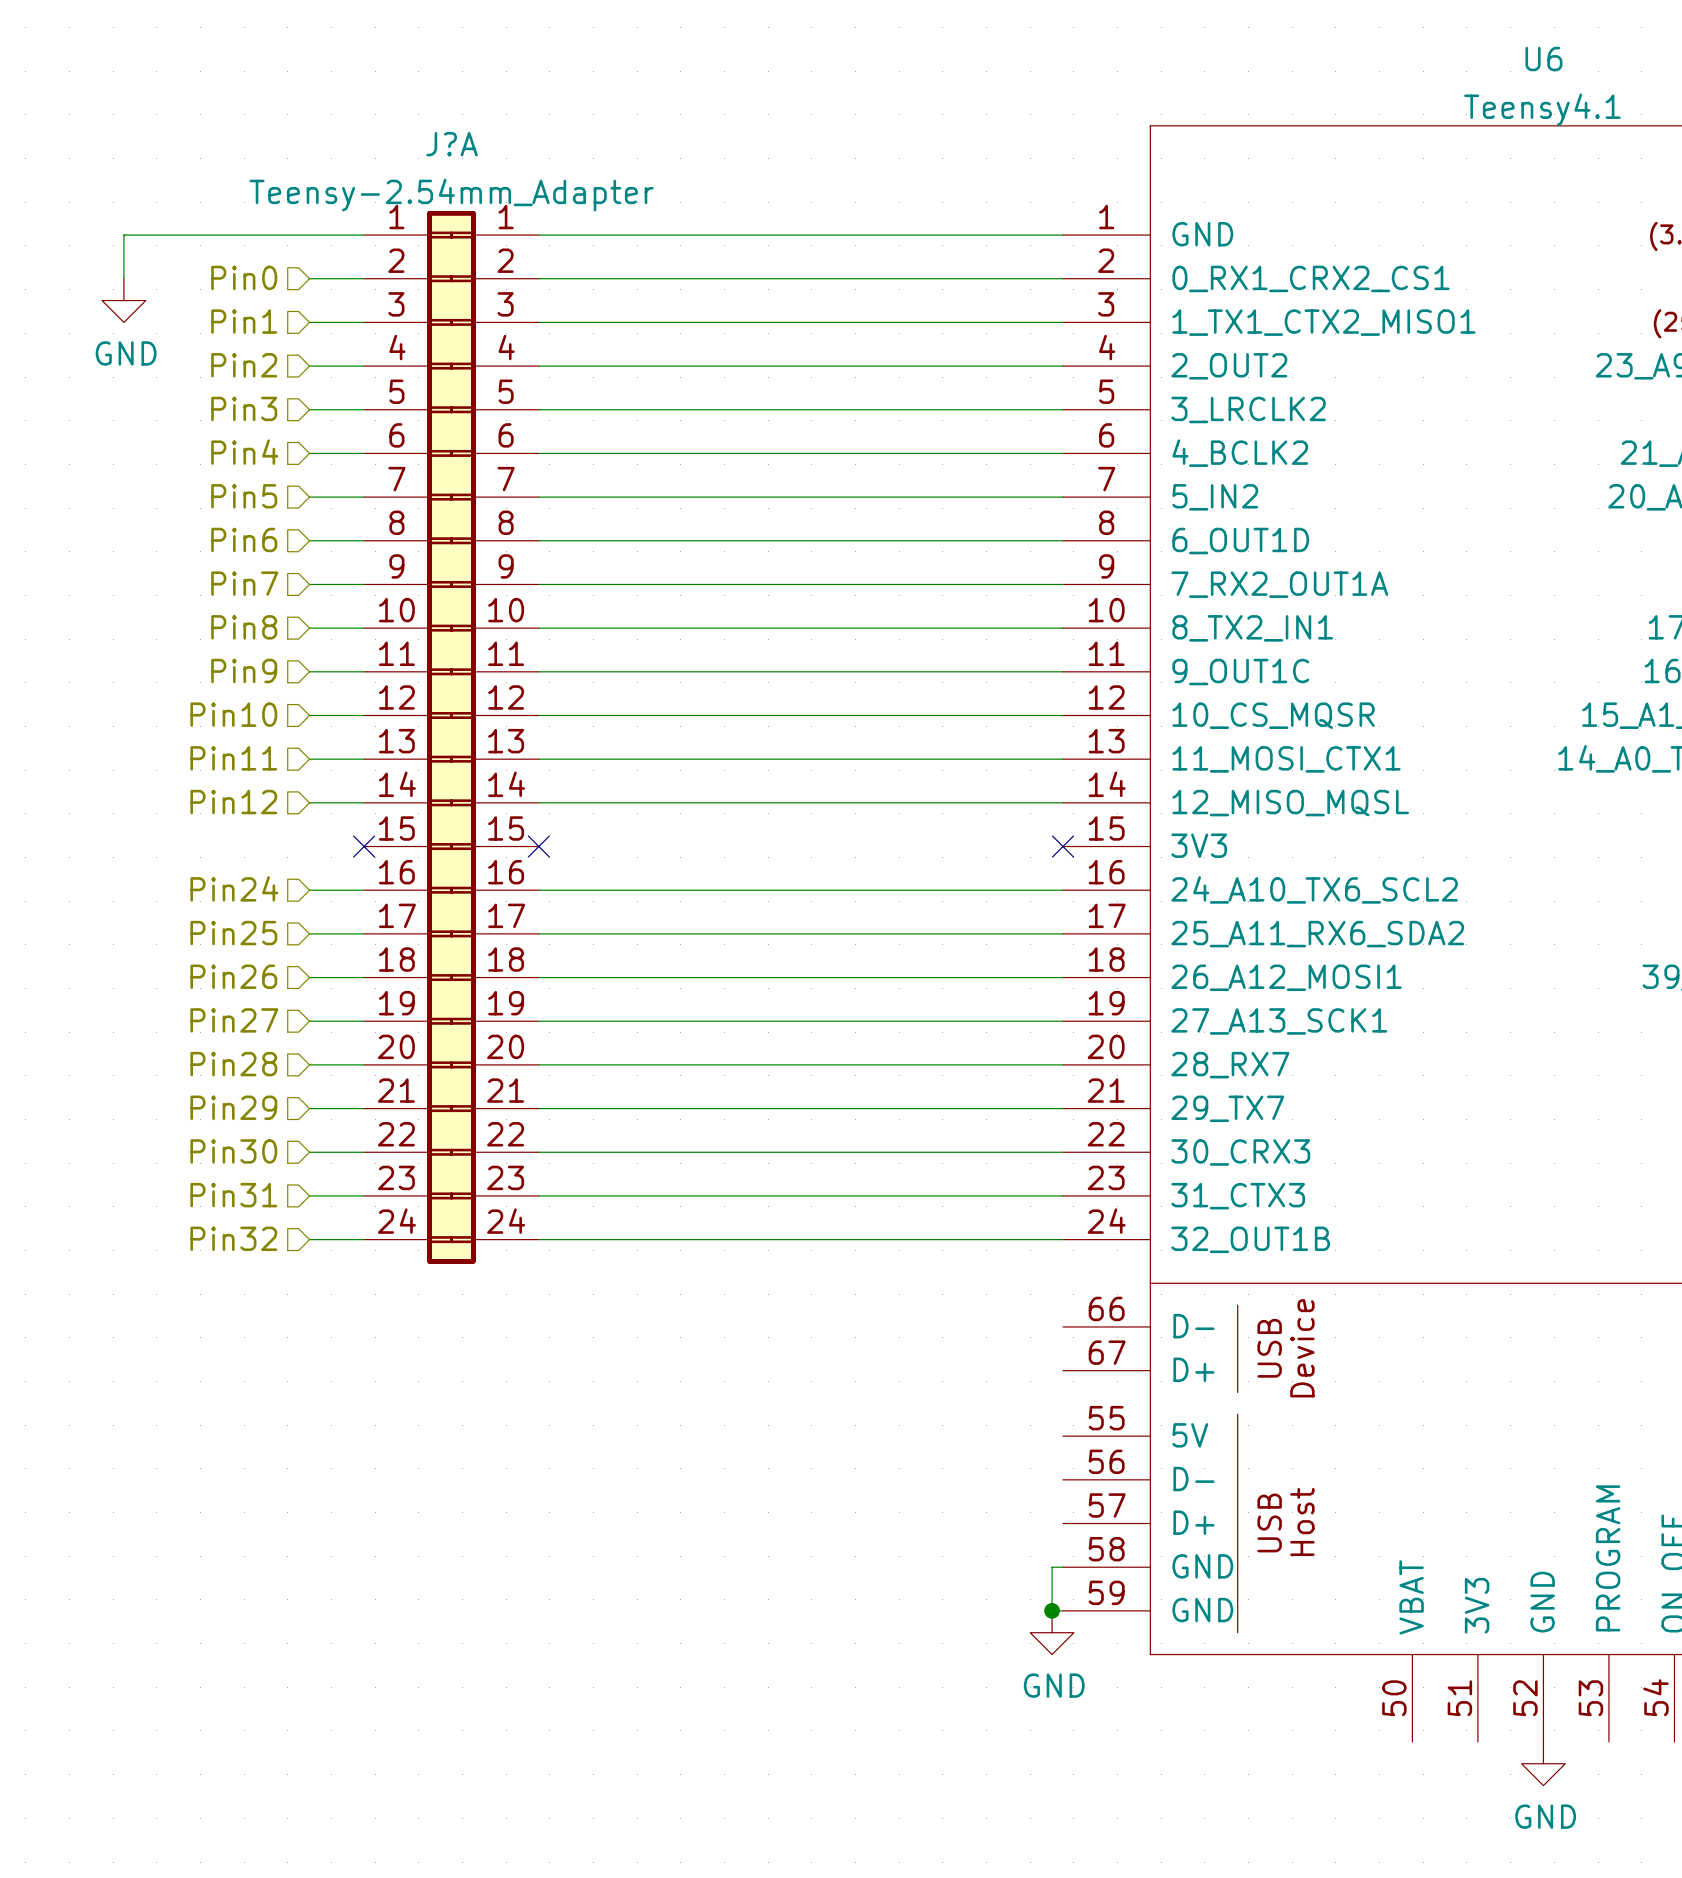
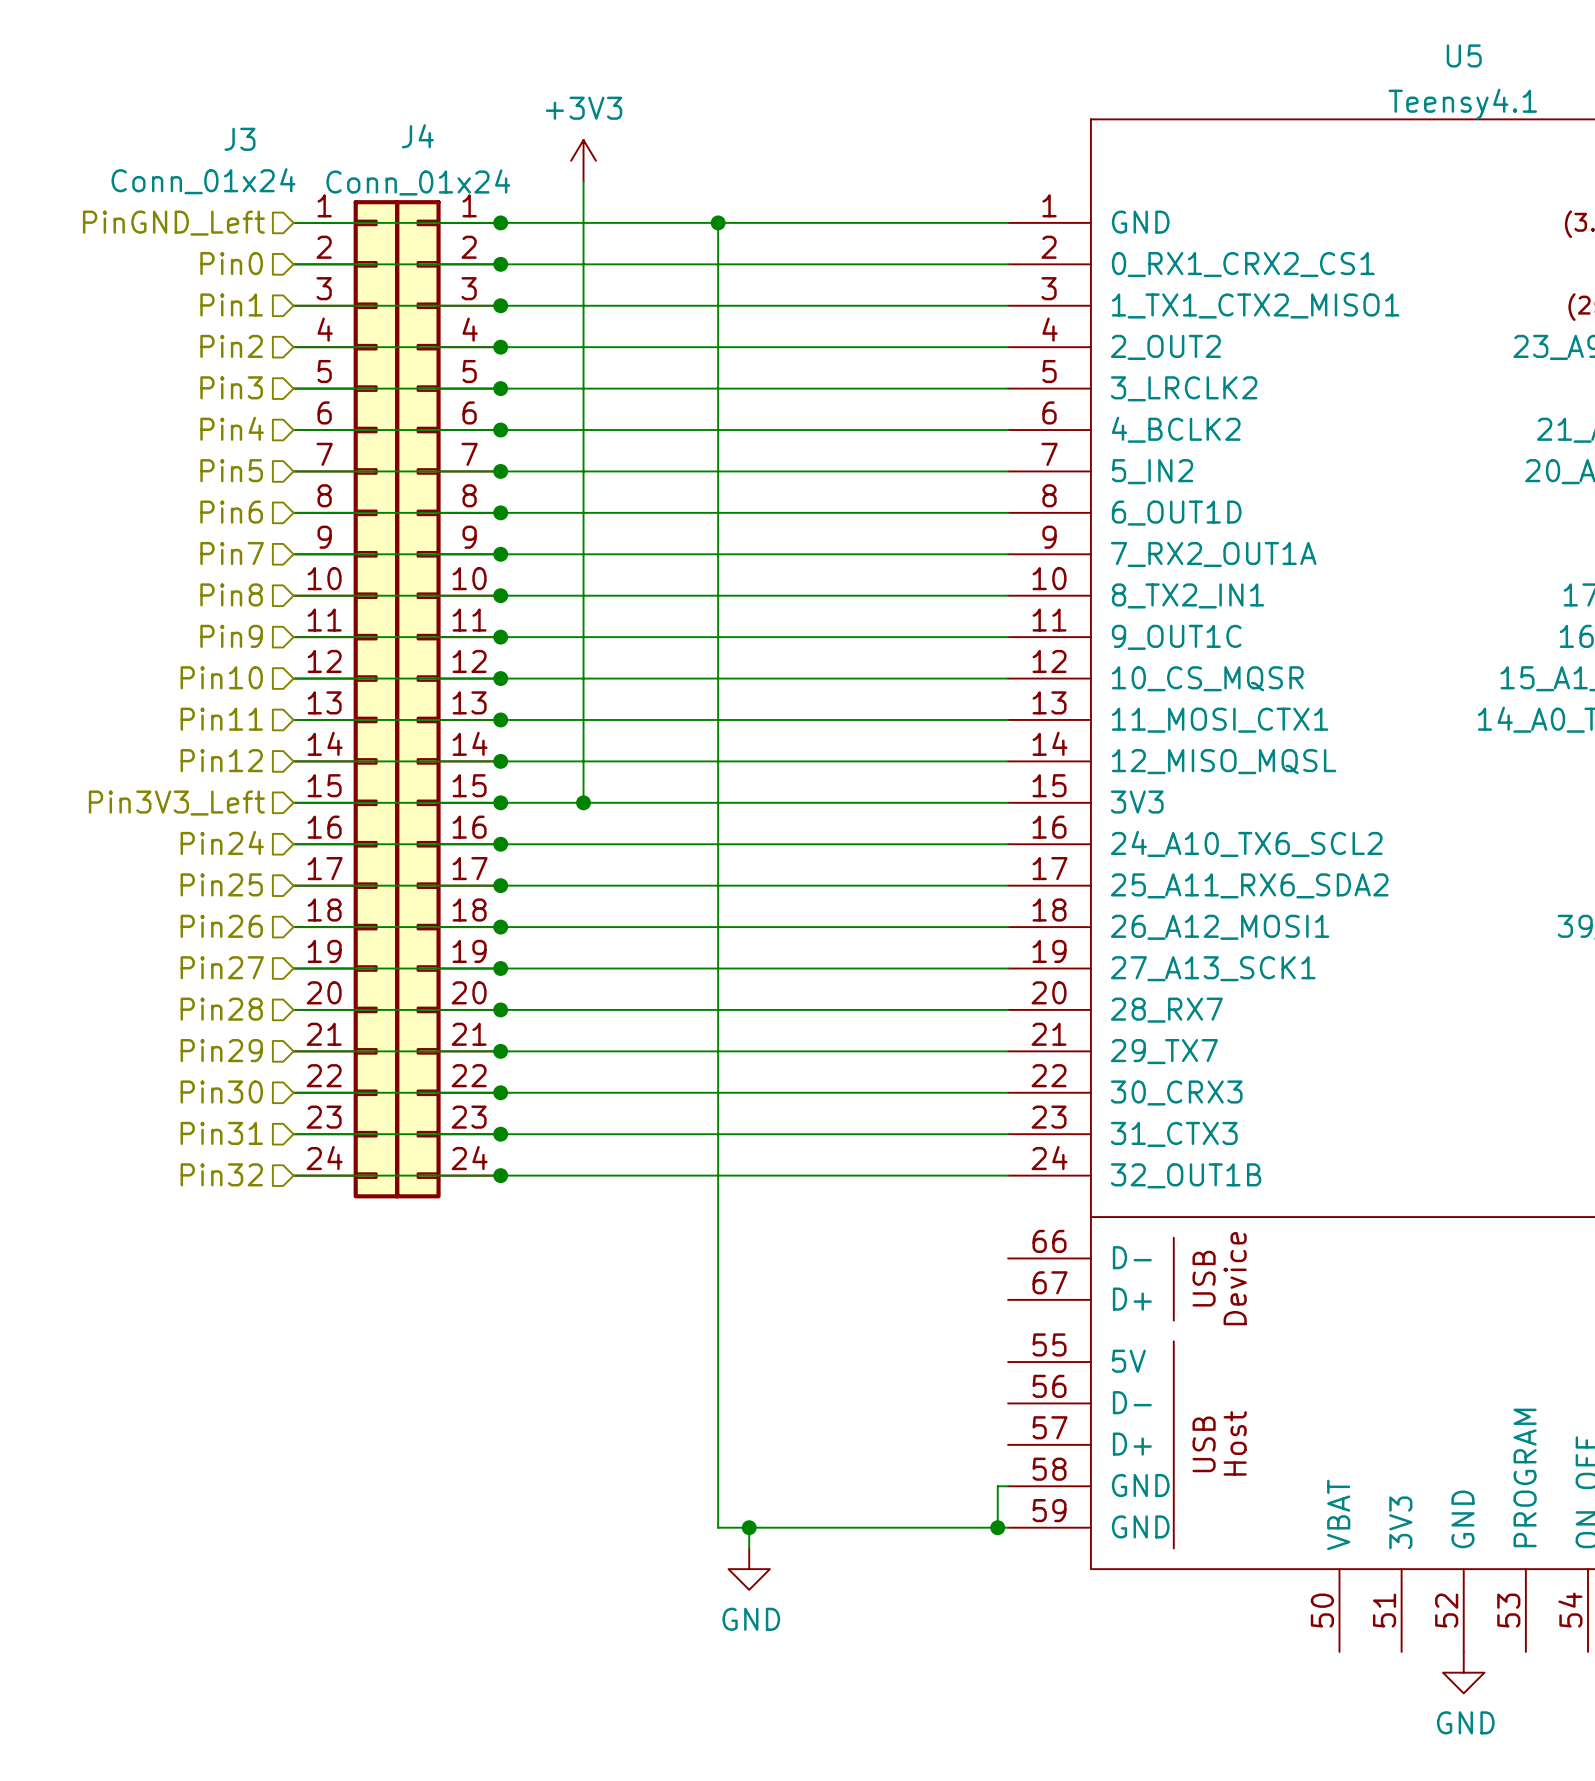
U6 name: U6 (1543, 59) -> U5 (1464, 55)
power symbol: none -> +3V3 (583, 160)
wire: none -> (583, 181) (583, 802)
hierarchical label: none -> PinGND_Left (173, 223)
wire: (309, 235) (123, 235) (123, 278) -> none
junction: none -> (500, 222)
wire: none -> (718, 222) (718, 1527) (997, 1527)
junction: none -> (718, 222)
junction: none -> (500, 264)
power symbol: GND (123, 300) -> none
junction: none -> (500, 305)
junction: none -> (500, 347)
junction: none -> (500, 388)
junction: none -> (500, 430)
junction: none -> (500, 471)
junction: none -> (500, 512)
junction: none -> (500, 554)
junction: none -> (500, 595)
junction: none -> (500, 637)
junction: none -> (500, 678)
J3: none -> Conn_01x24 (346, 699)
J?A: Teensy-2.54mm_Adapter (451, 737) -> none
J4: none -> Conn_01x24 (447, 699)
junction: none -> (500, 719)
junction: none -> (500, 761)
hierarchical label: none -> Pin3V3_Left (176, 803)
wire: none -> (293, 802) (1008, 802)
no-connect mark: (364, 846) -> none
junction: none -> (500, 802)
no-connect mark: (538, 846) -> none
junction: none -> (583, 802)
no-connect mark: (1062, 846) -> none
junction: none -> (500, 844)
junction: none -> (500, 885)
junction: none -> (500, 927)
junction: none -> (500, 968)
junction: none -> (500, 1009)
junction: none -> (500, 1051)
junction: none -> (500, 1092)
junction: none -> (500, 1134)
junction: none -> (500, 1175)
wire: none -> (749, 1527) (749, 1548)
junction: none -> (749, 1527)
power symbol position: GND (1052, 1632) -> GND (749, 1569)

